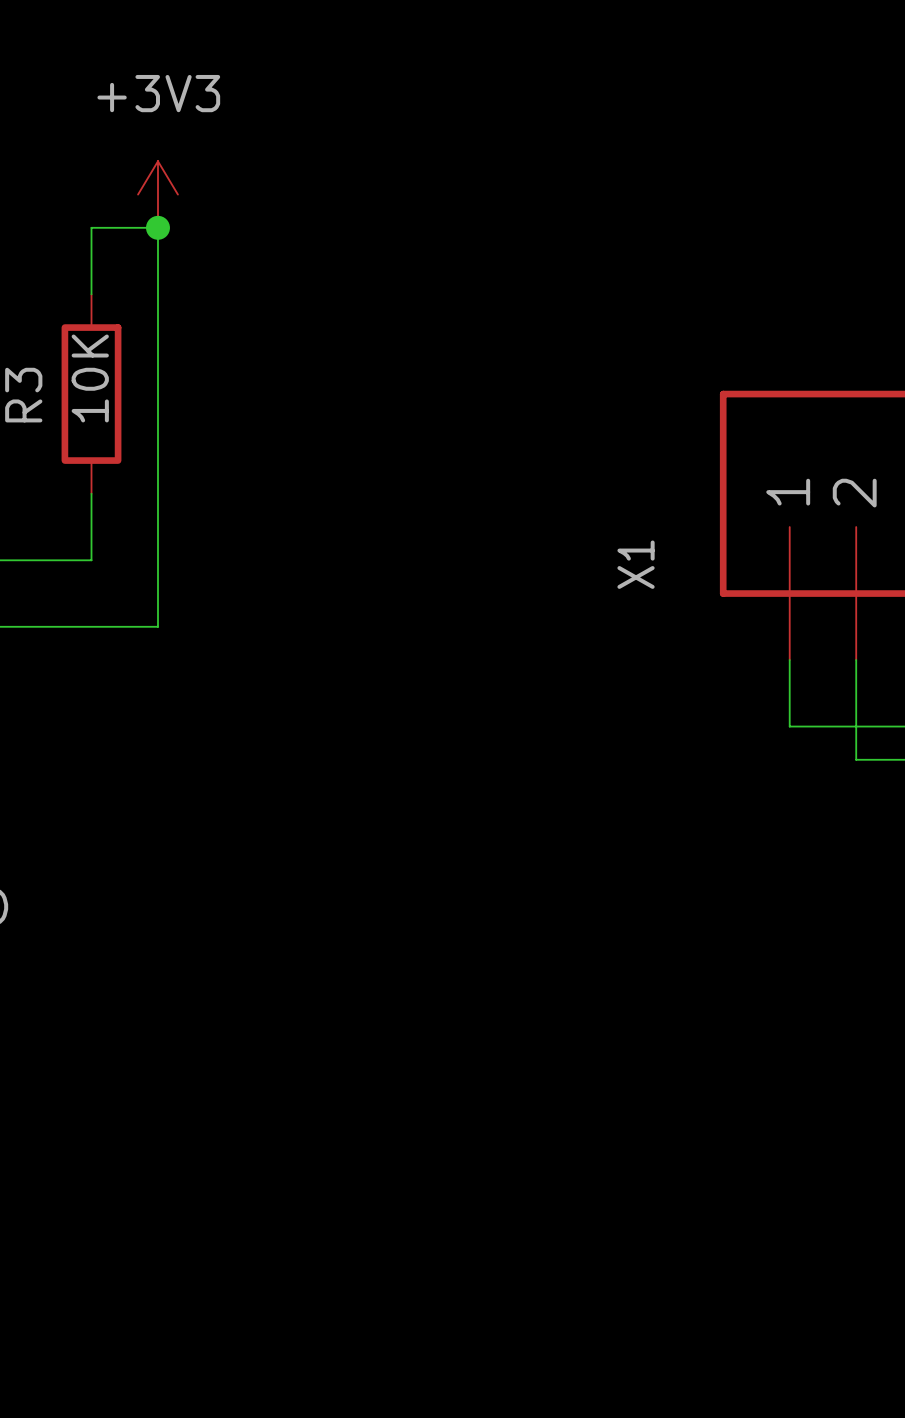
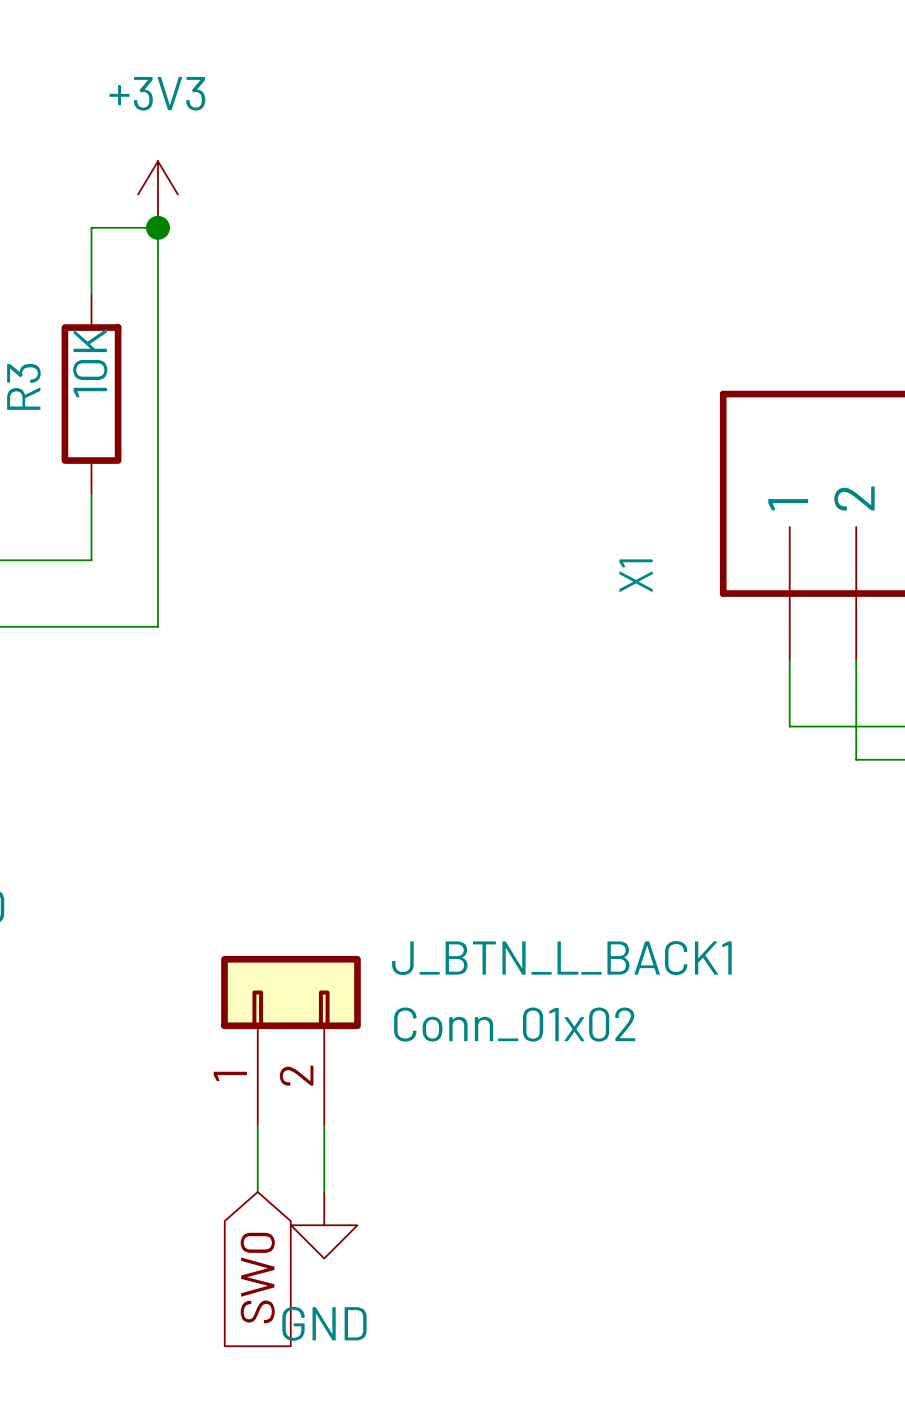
J_BTN_L_BACK1: none -> Conn_01x02 (290, 1040)
wire: none -> (257, 1125) (257, 1192)
wire: none -> (324, 1125) (324, 1192)
power symbol: none -> GND (324, 1225)
global label: none -> SW0 (257, 1278)

